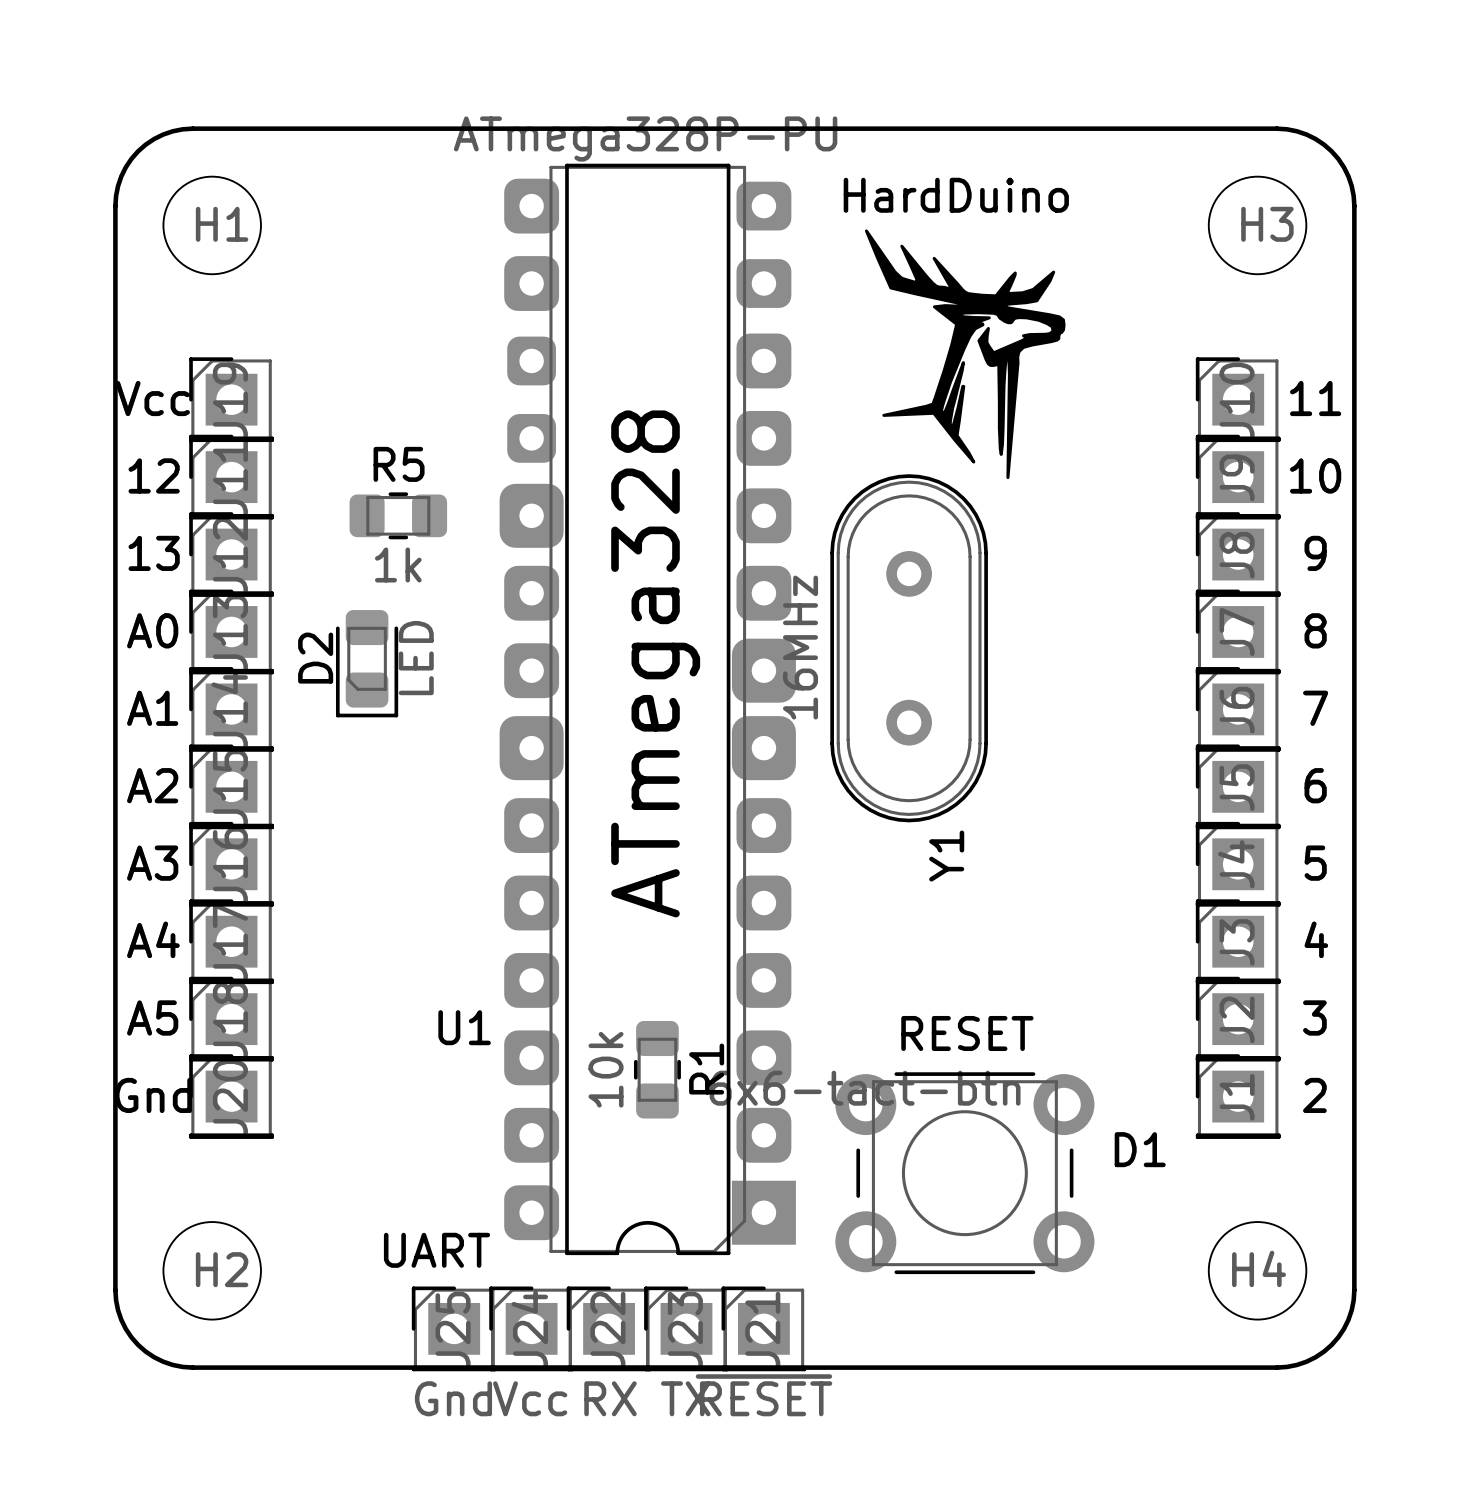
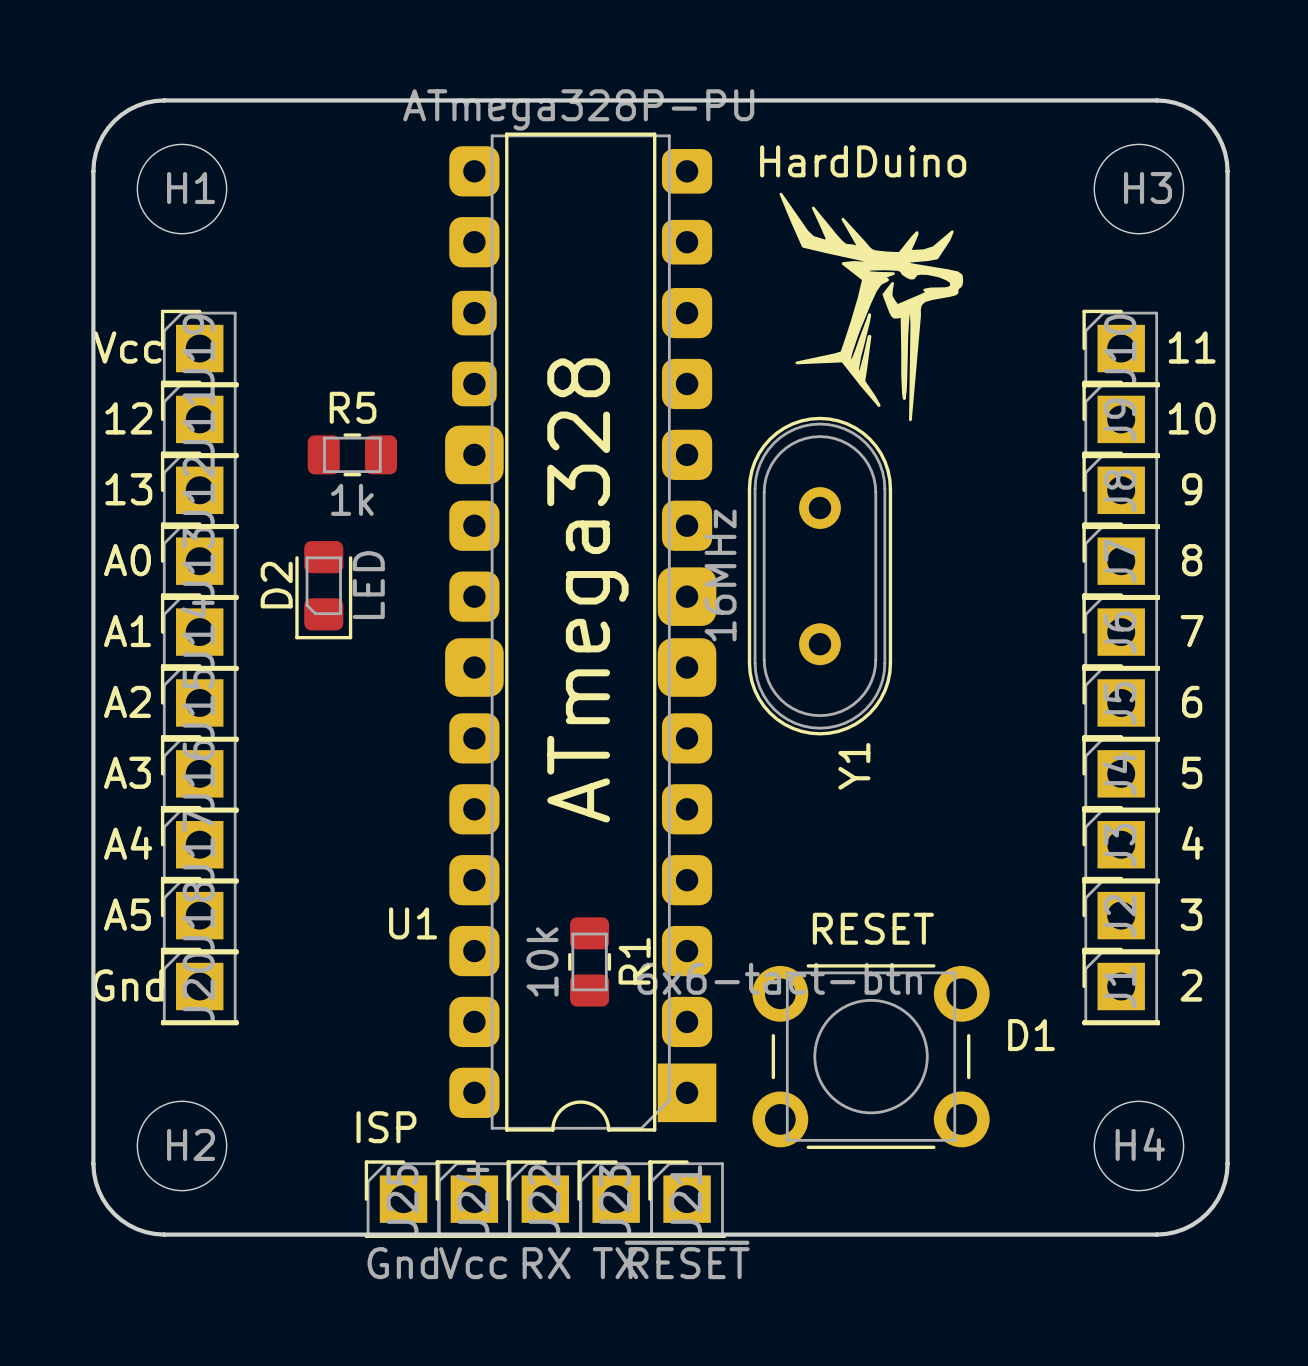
text: UART (437, 1250) -> ISP (386, 1127)

